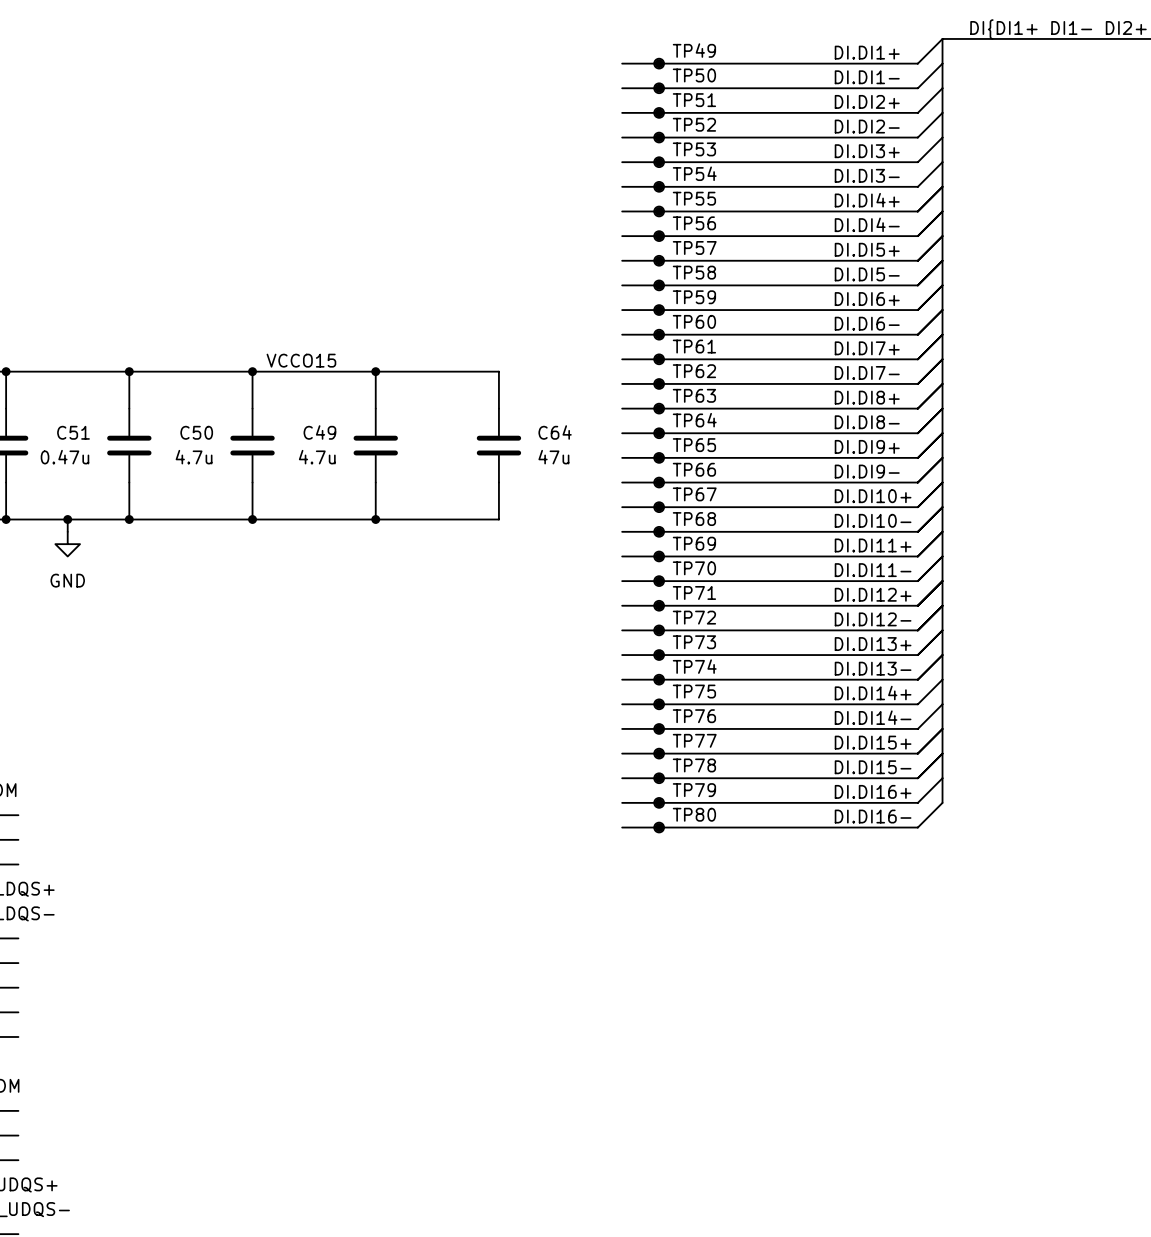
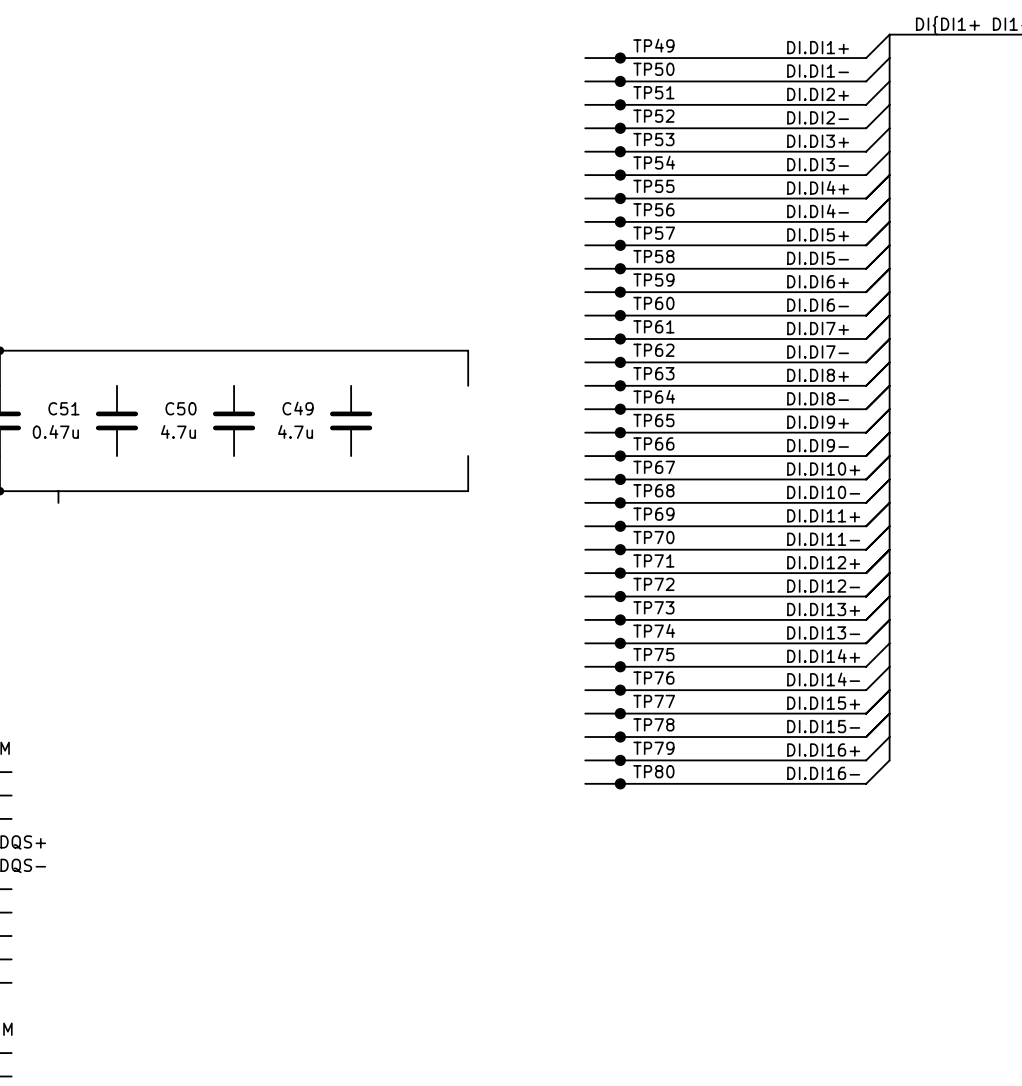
label: VCCO15 (301, 360) -> none
wire: (129, 371) (129, 408) -> none
junction: (129, 371) -> none
wire: (252, 371) (252, 408) -> none
junction: (252, 371) -> none
wire: (375, 371) (375, 408) -> none
junction: (375, 371) -> none
C64: 47u (498, 445) -> none
wire: (129, 482) (129, 519) -> none
wire: (252, 482) (252, 519) -> none
wire: (375, 482) (375, 519) -> none
junction: (67, 519) -> none
junction: (129, 519) -> none
junction: (252, 519) -> none
junction: (375, 519) -> none
power symbol: GND (67, 544) -> none

